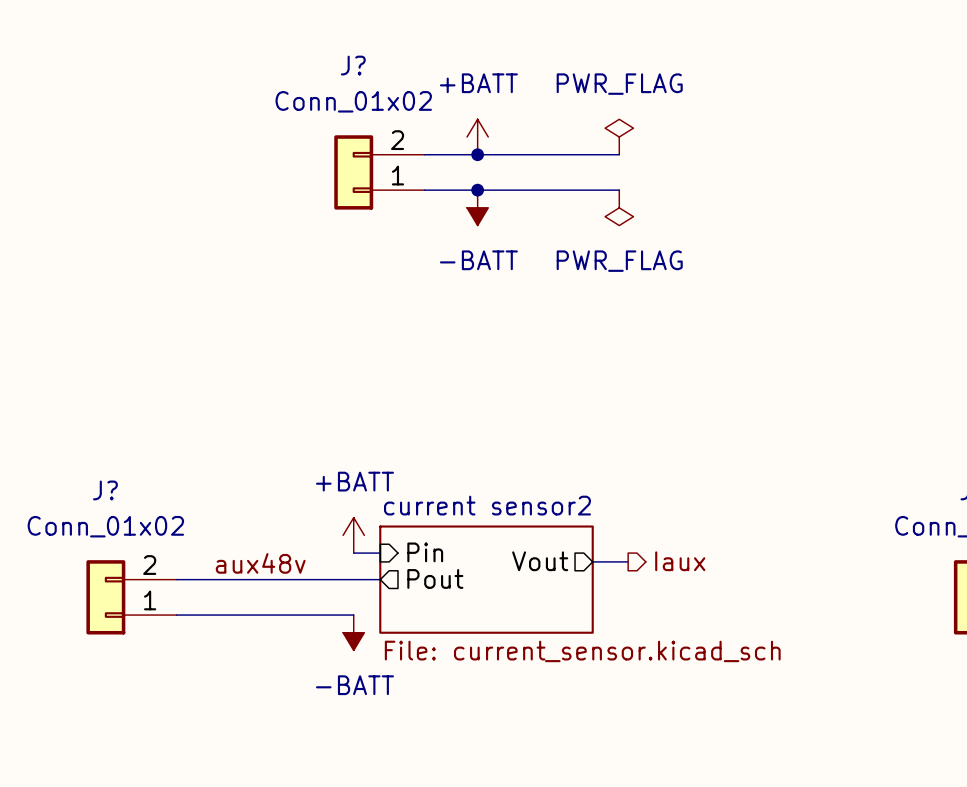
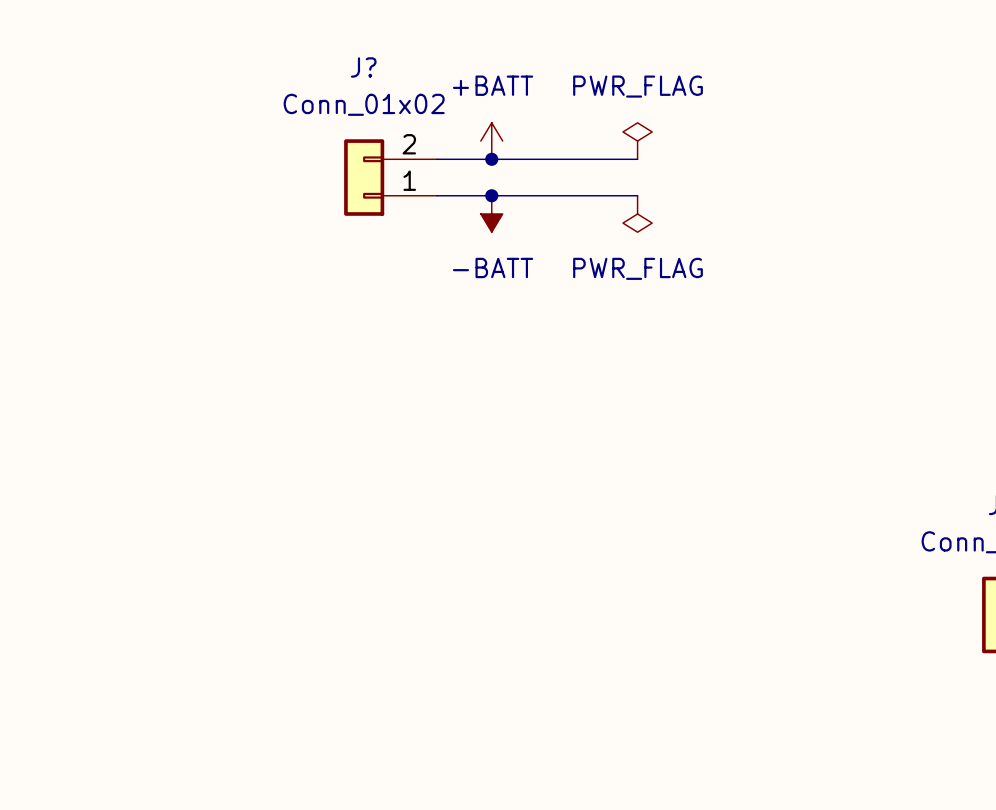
power symbol: +BATT (353, 535) -> none
sheet pin: Pin (425, 552) -> none
wire: (353, 553) (380, 553) -> none
sheet pin: Vout (540, 561) -> none
wire: (592, 561) (628, 561) -> none
hierarchical label: Iaux (680, 561) -> none
label: aux48v (260, 563) -> none
sheet pin: Pout (435, 578) -> none
wire: (176, 579) (380, 579) -> none
sheet current sensor2: File: current_sensor.kicad_sch (486, 579) -> none
J?: Conn_01x02 (131, 597) -> none
wire: (176, 615) (353, 615) -> none
power symbol: -BATT (353, 632) -> none

